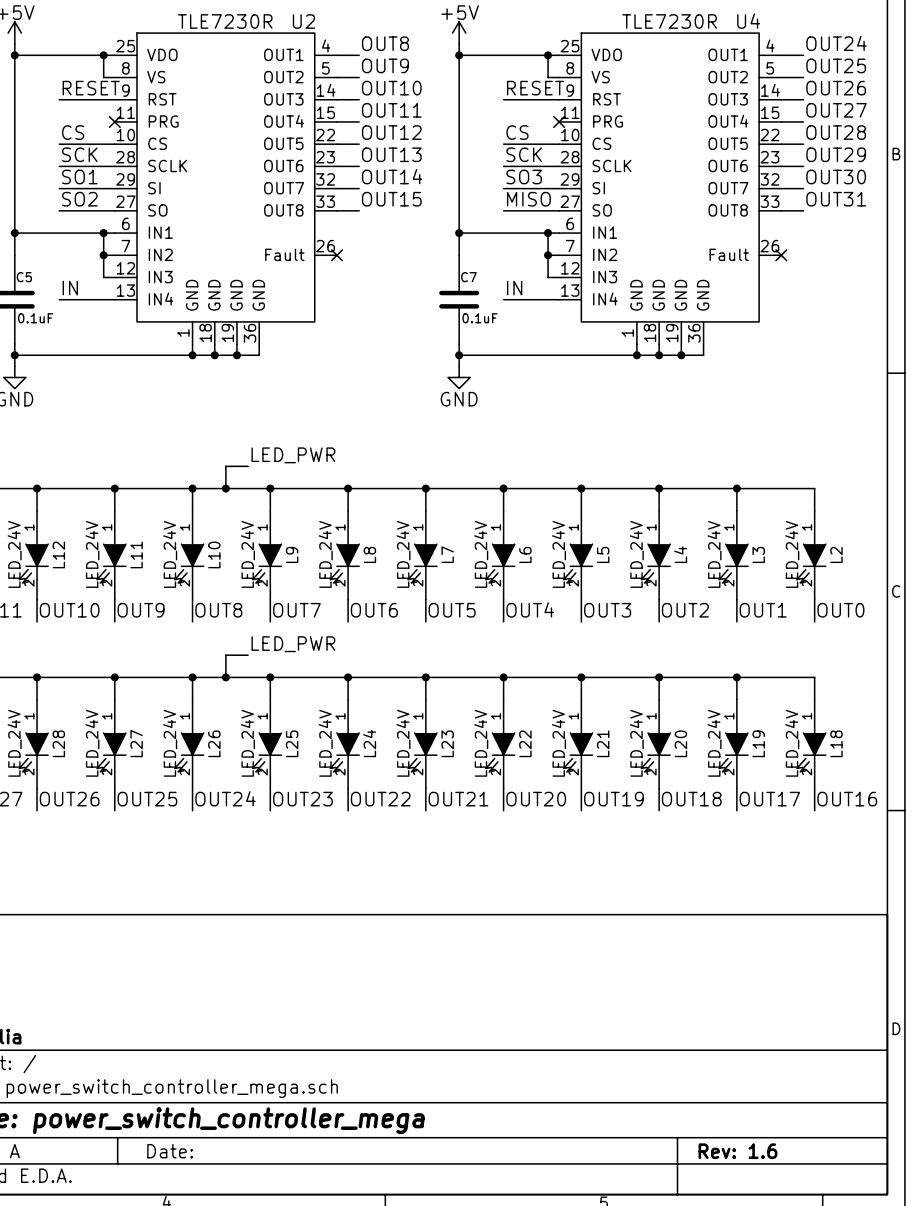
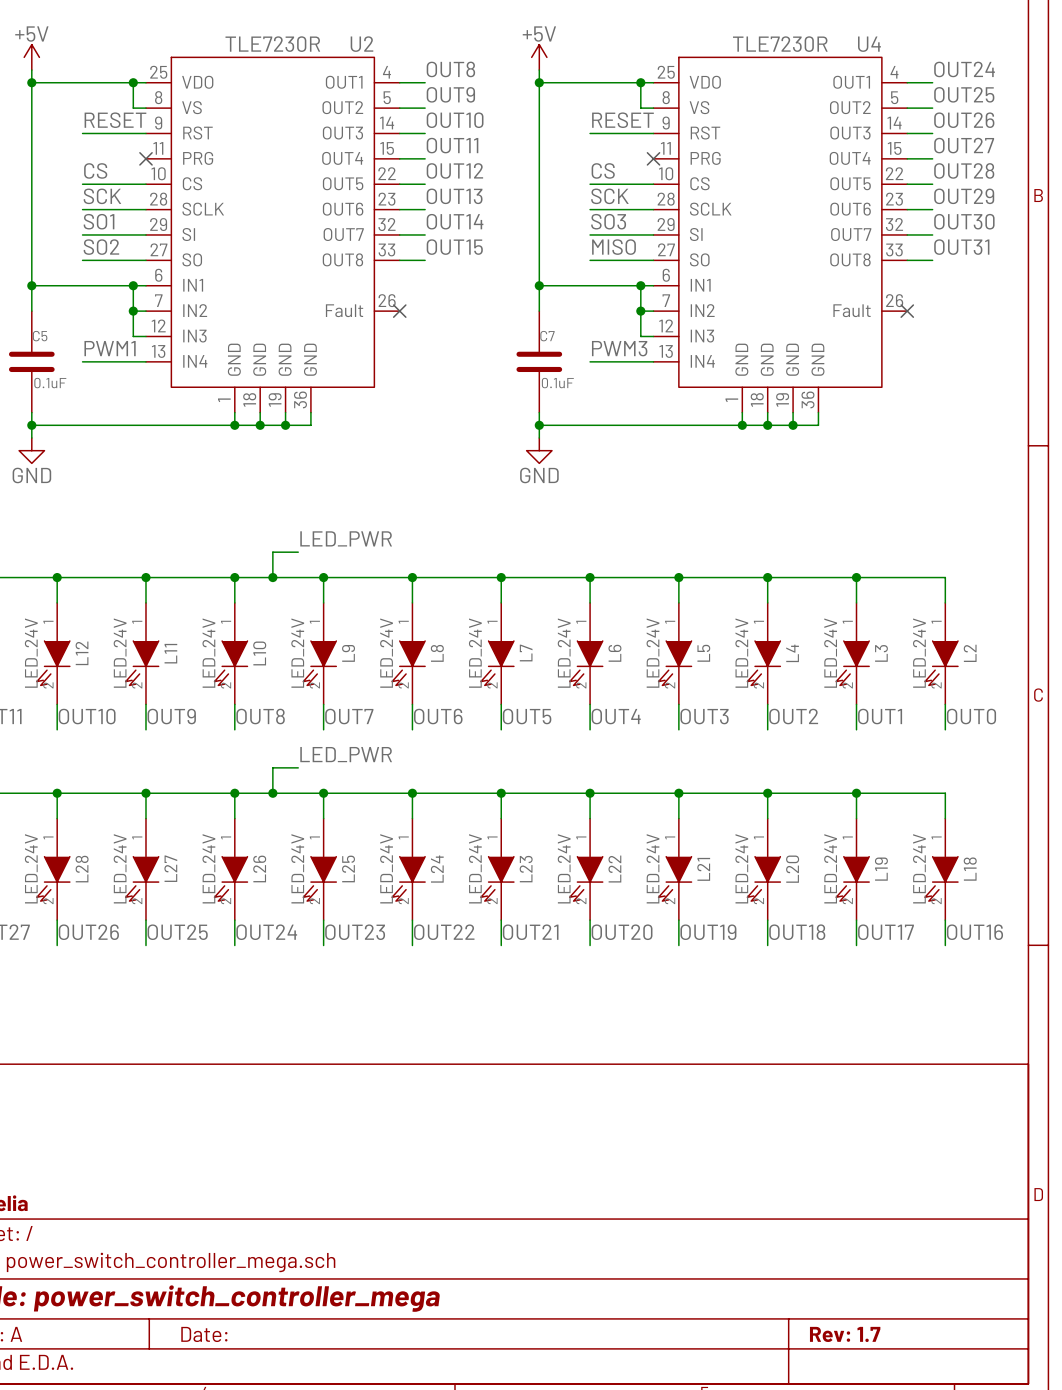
label: IN (70, 288) -> PWM1 (110, 348)
label: IN (514, 288) -> PWM3 (619, 348)
title block: Rev: 1.6 (737, 1151) -> Rev: 1.7 (845, 1334)

